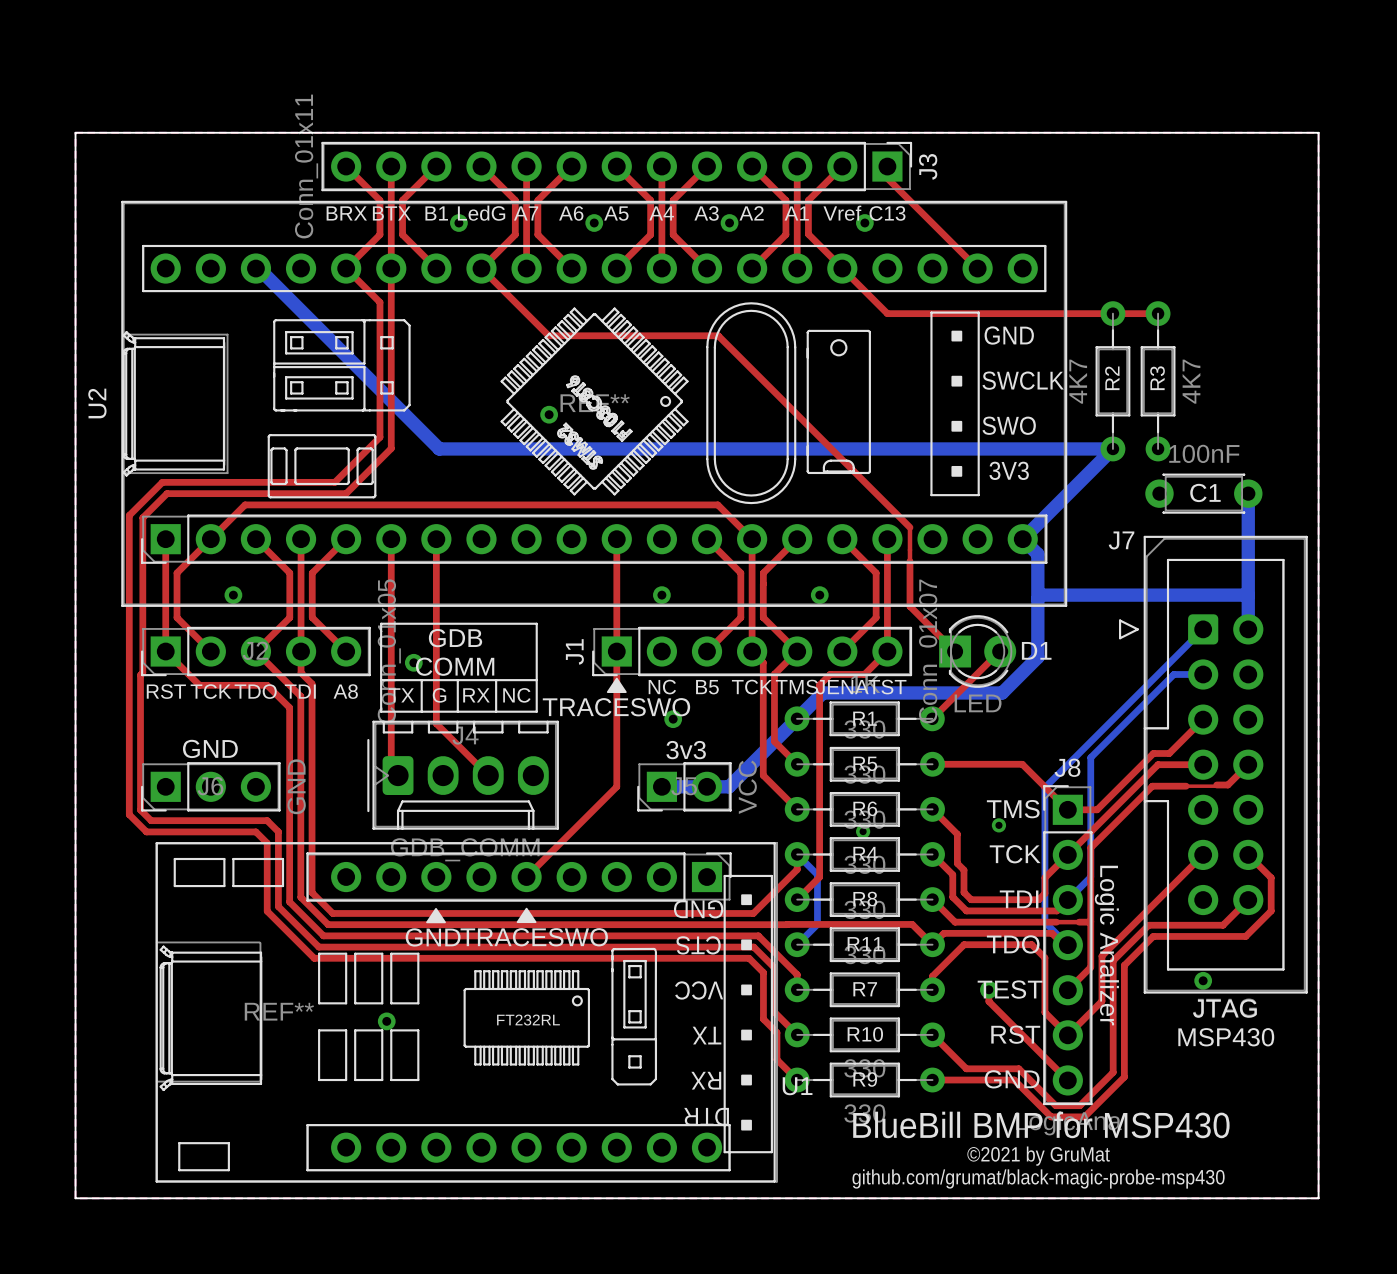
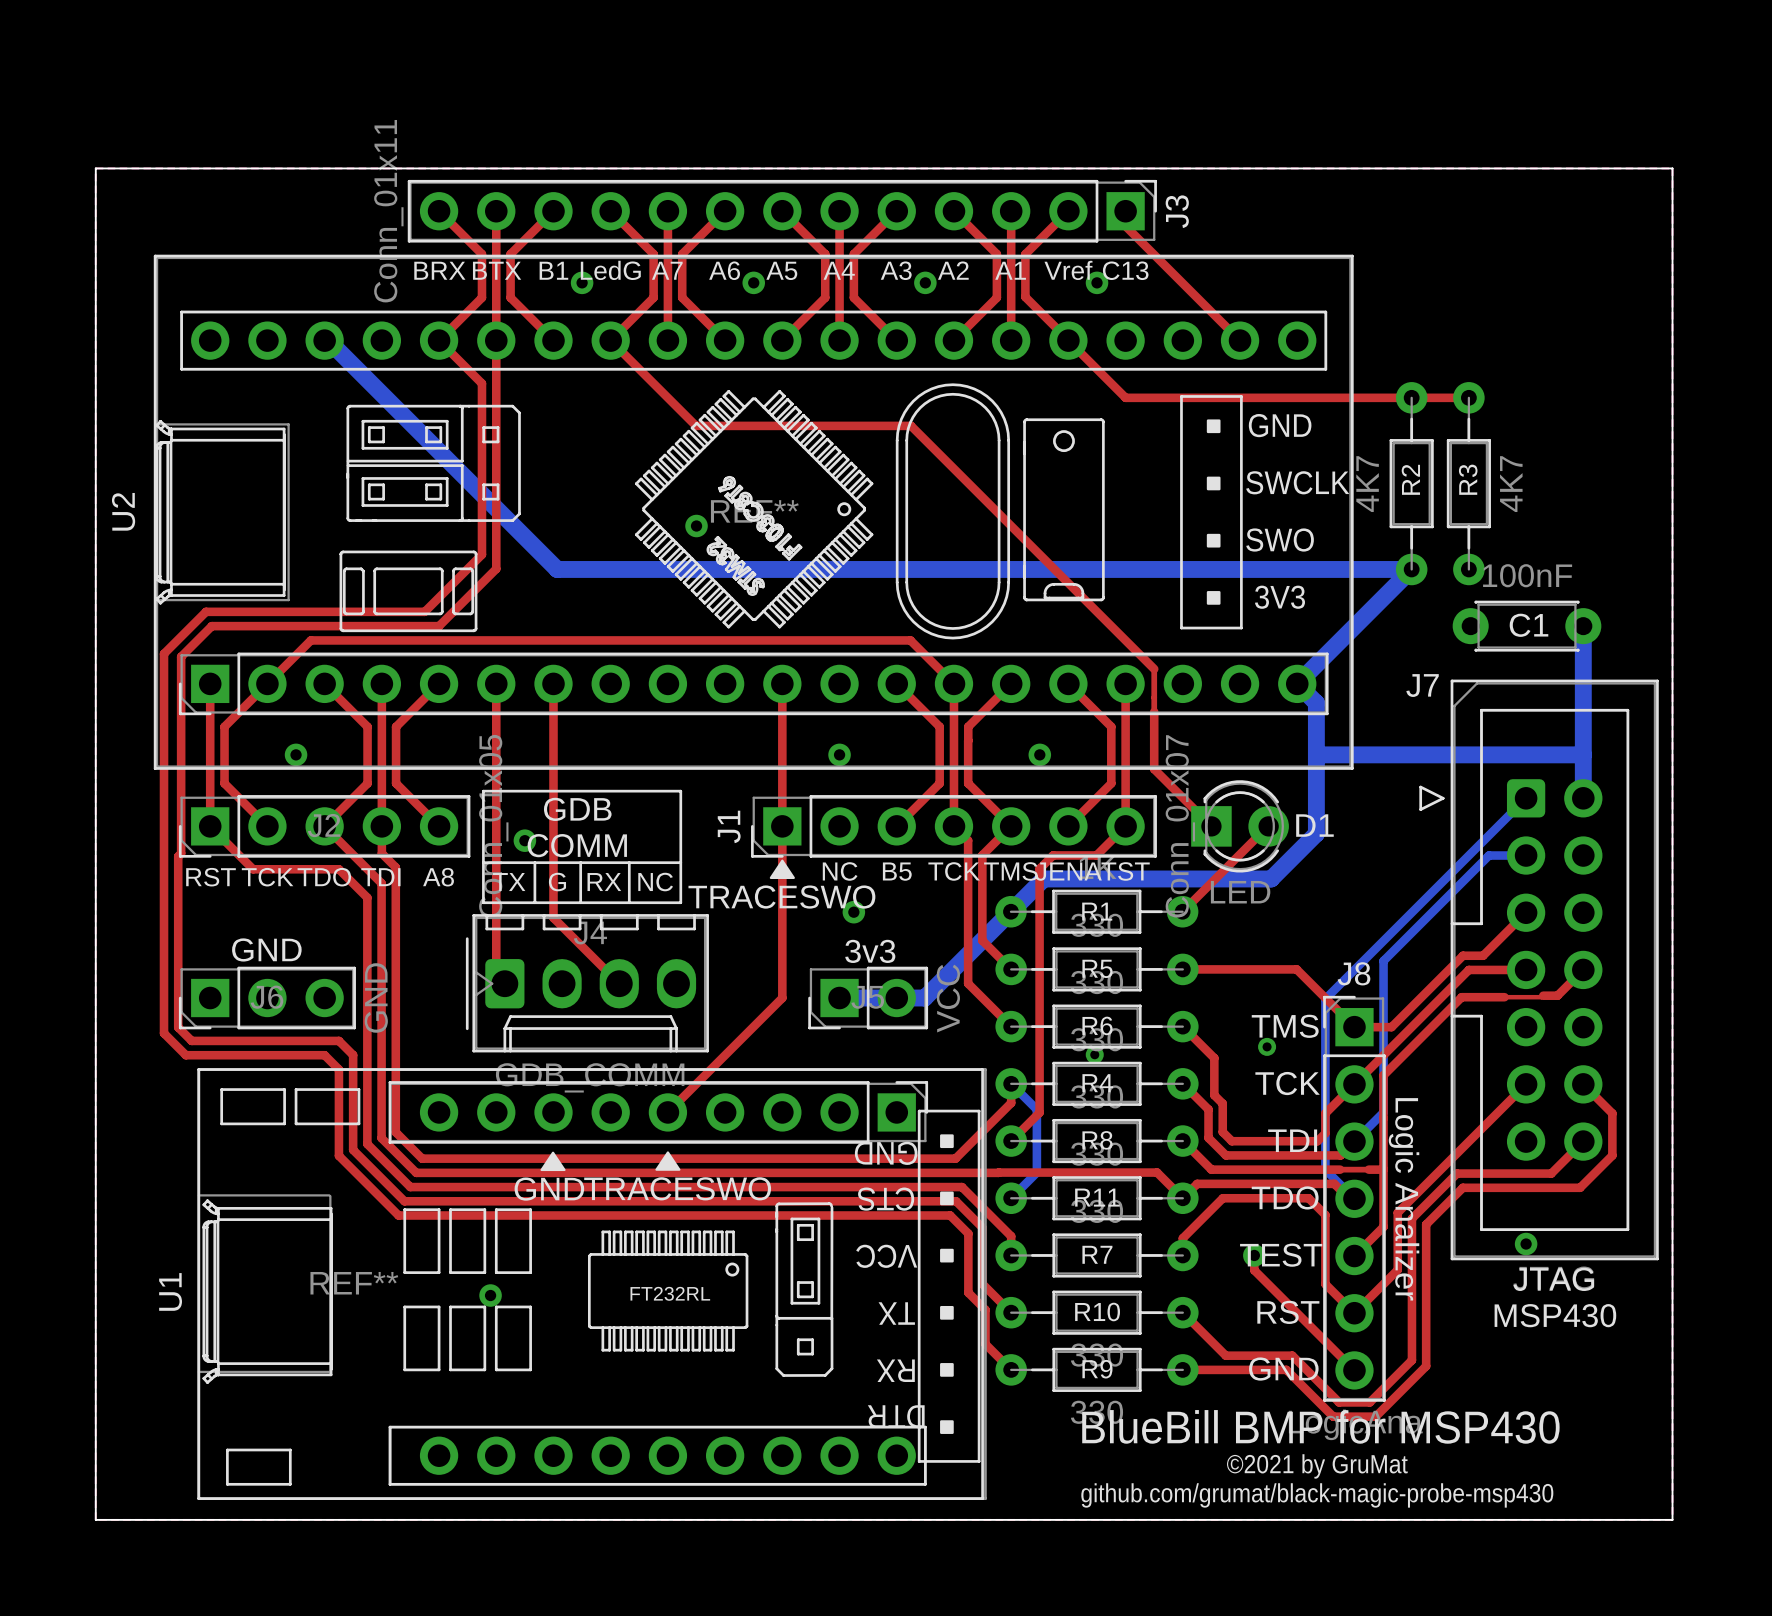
U1 name rotation: 0° (797, 1086) -> 90° counterclockwise (170, 1291)
U1 name position: U1 (797, 1086) -> U1 (170, 1291)

